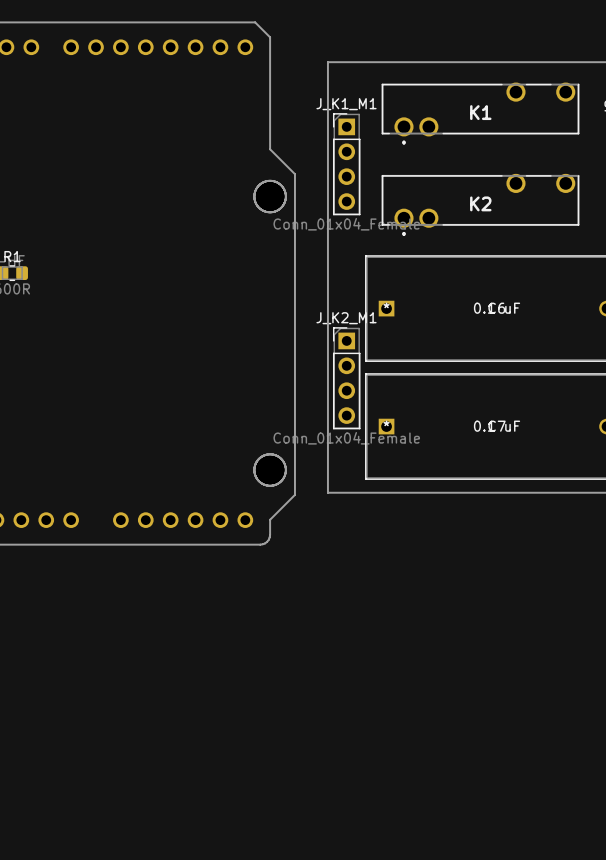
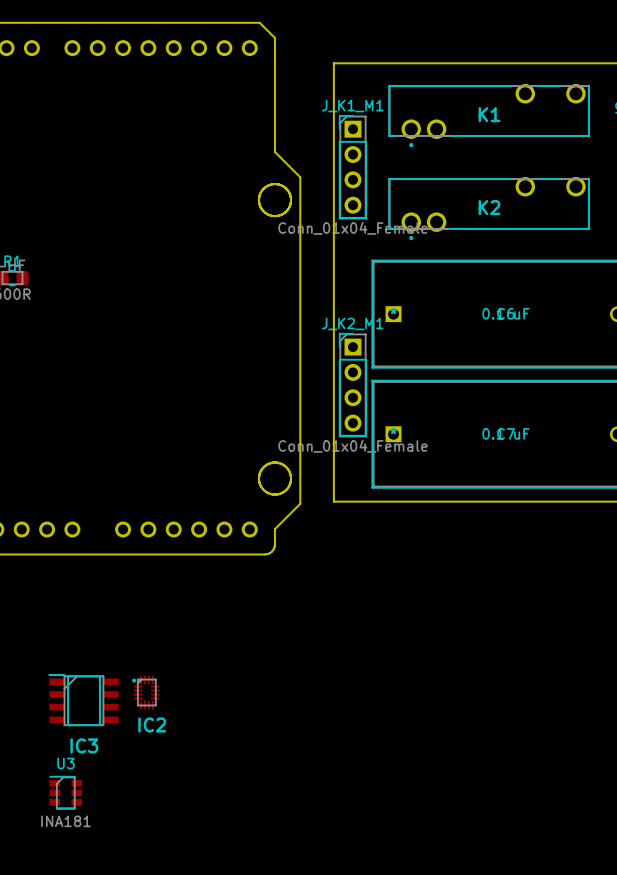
IC2: none -> (145, 692)
IC3: none -> (83, 700)
U3: none -> INA181 (65, 792)

